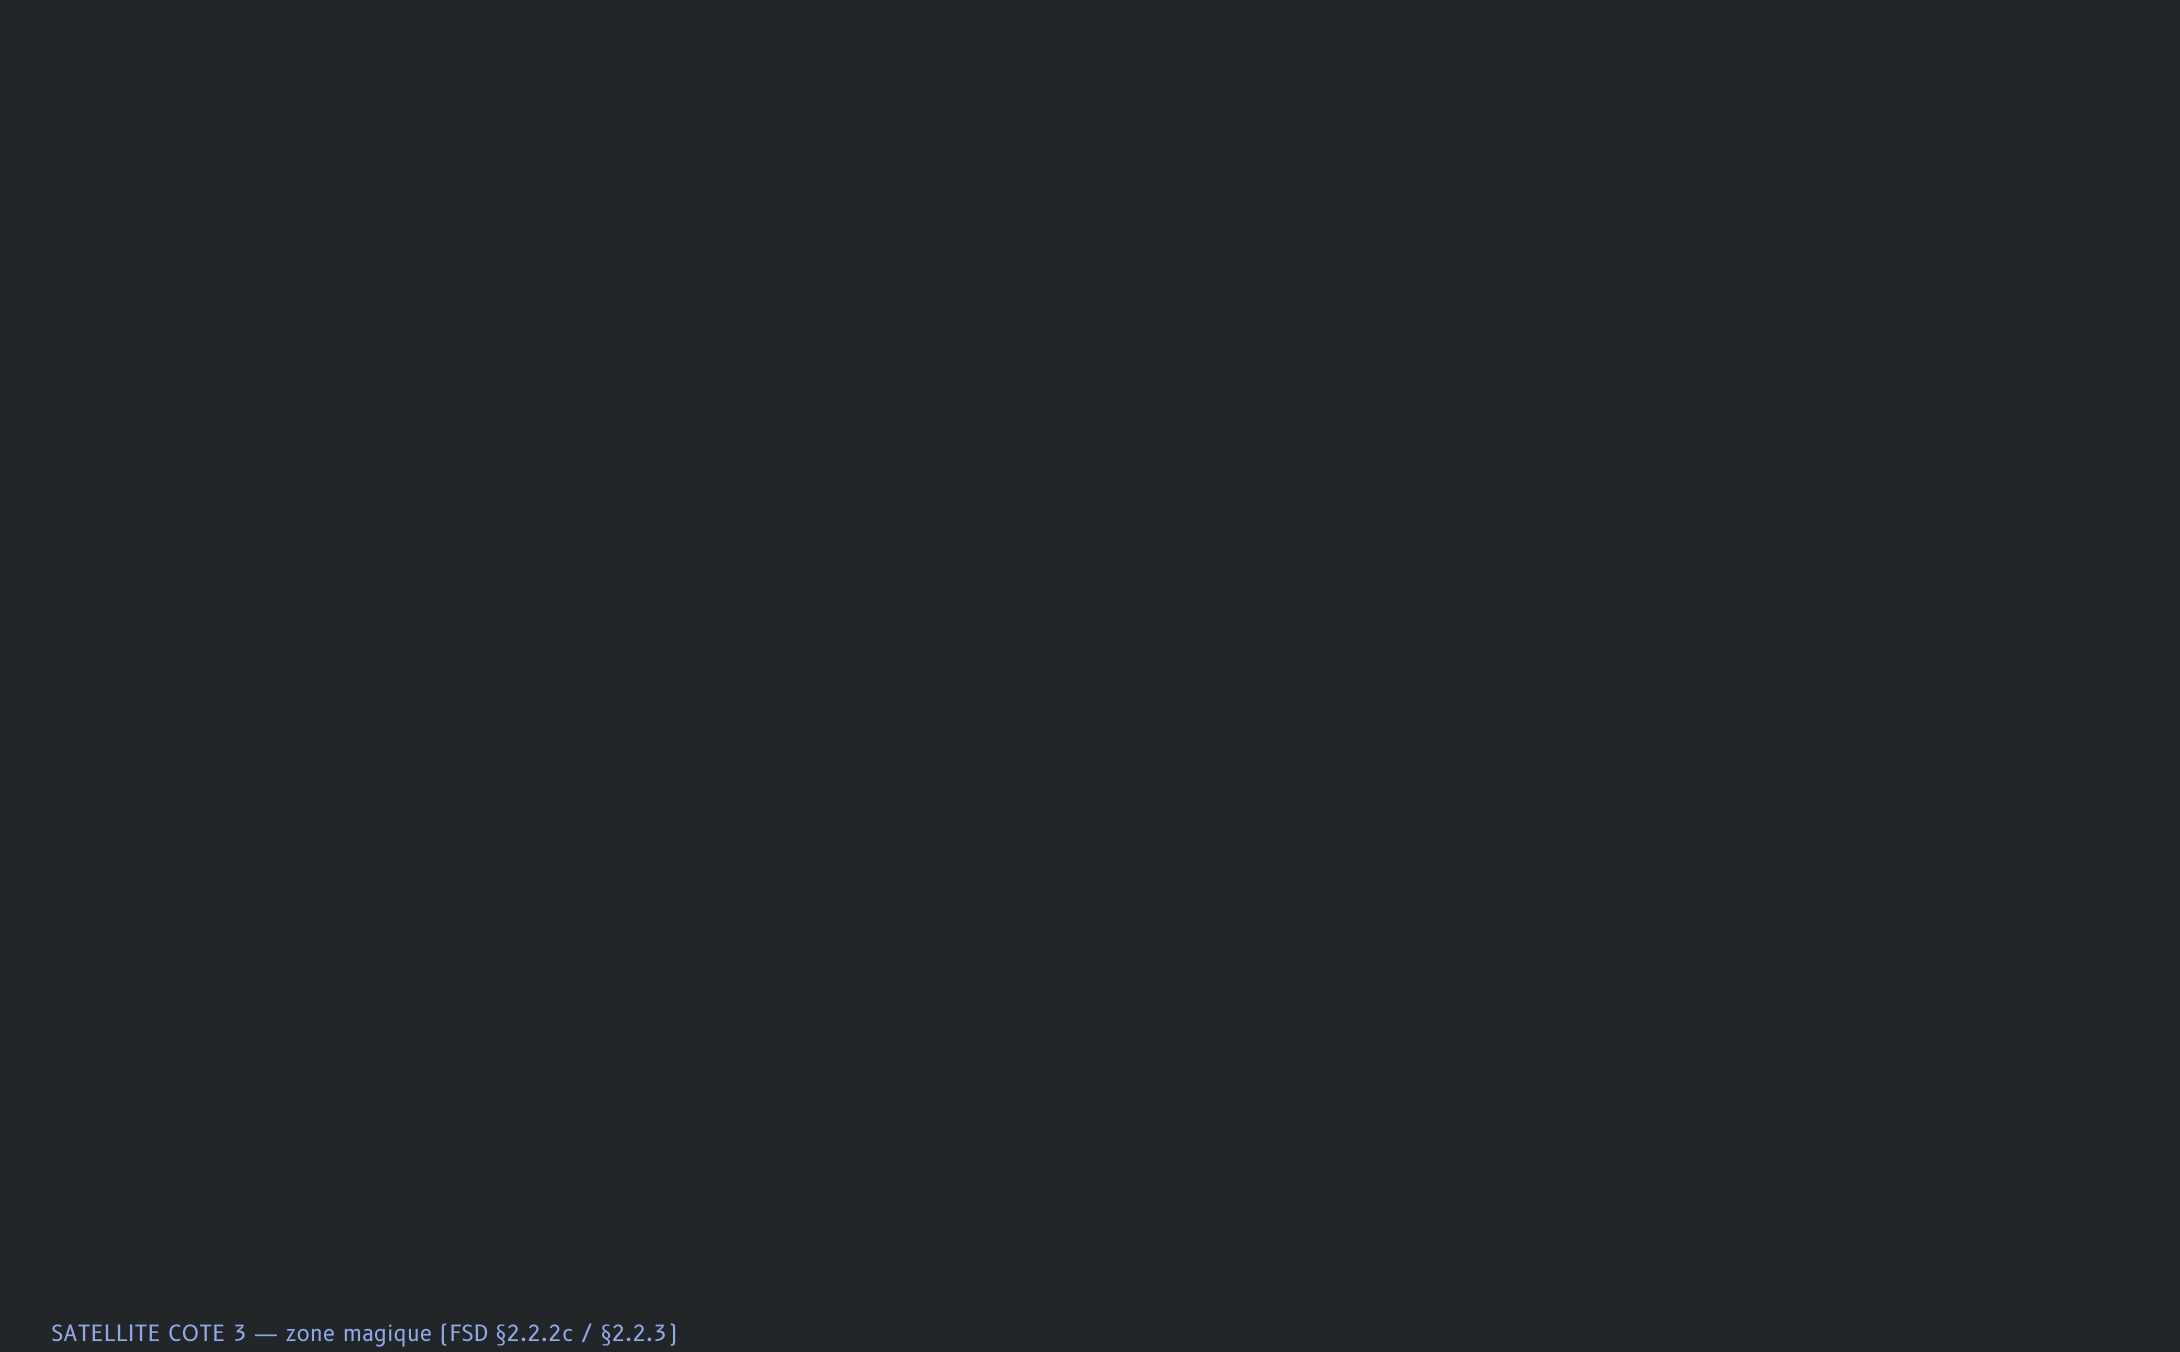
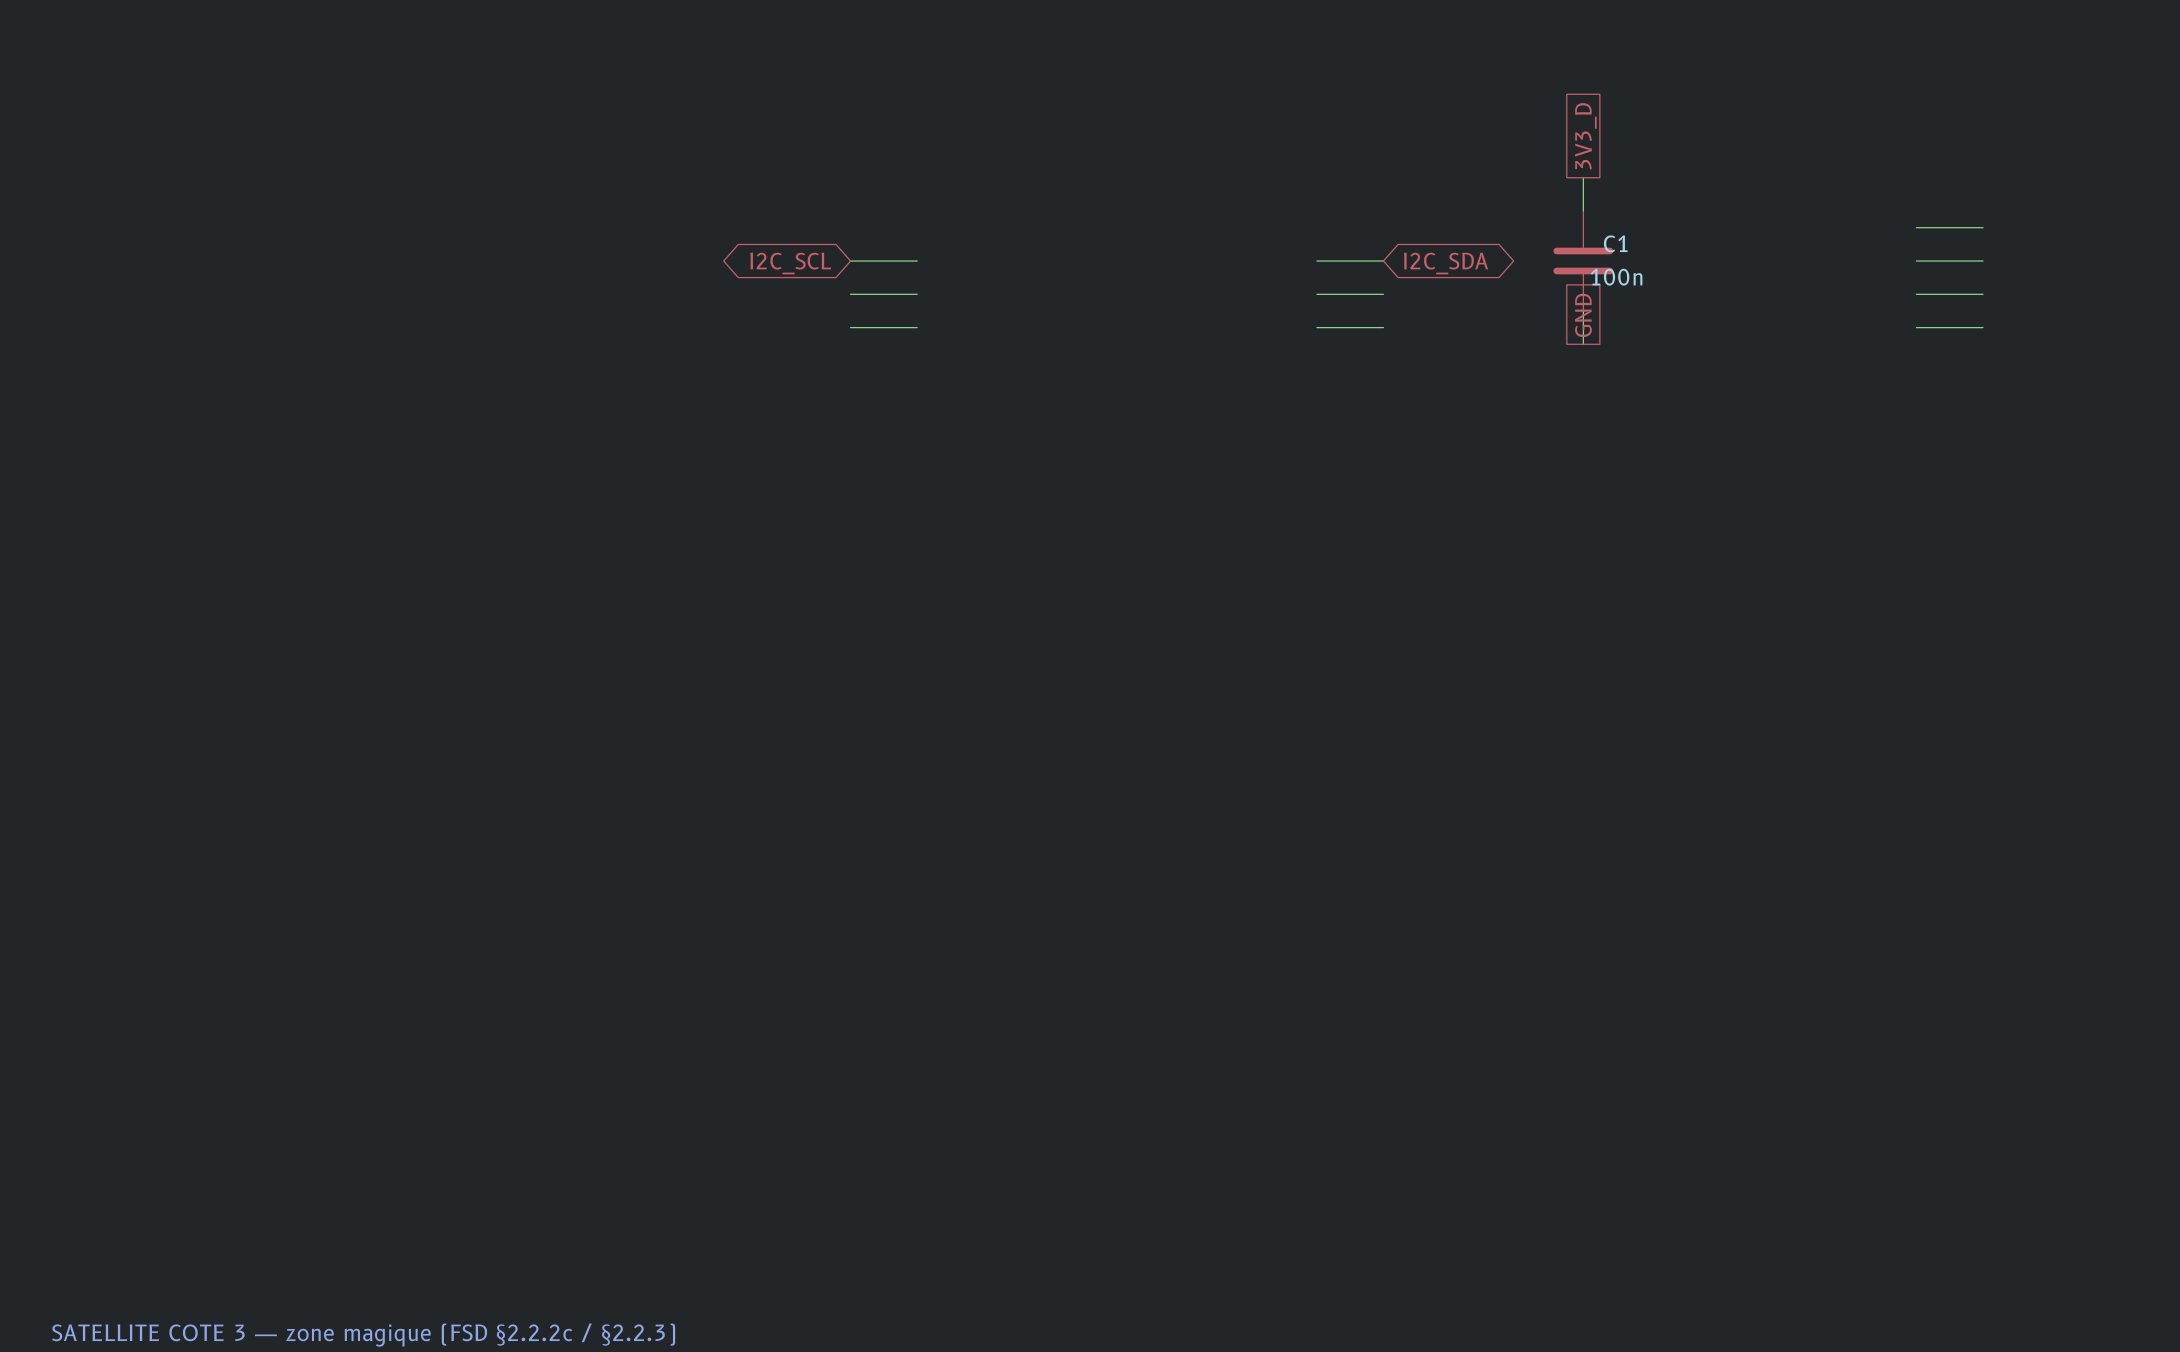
global label: none -> 3V3_D (1585, 136)
wire: none -> (1583, 177) (1583, 211)
wire: none -> (1916, 227) (1983, 227)
wire: none -> (850, 261) (917, 261)
wire: none -> (1316, 261) (1383, 261)
C1: none -> 100n (1583, 261)
wire: none -> (1916, 261) (1983, 261)
global label: none -> I2C_SCL (790, 263)
global label: none -> I2C_SDA (1446, 263)
wire: none -> (850, 294) (917, 294)
wire: none -> (1316, 294) (1383, 294)
wire: none -> (1916, 294) (1983, 294)
wire: none -> (1583, 310) (1583, 344)
global label: none -> GND (1583, 315)
wire: none -> (850, 327) (917, 327)
wire: none -> (1316, 327) (1383, 327)
wire: none -> (1916, 327) (1983, 327)

